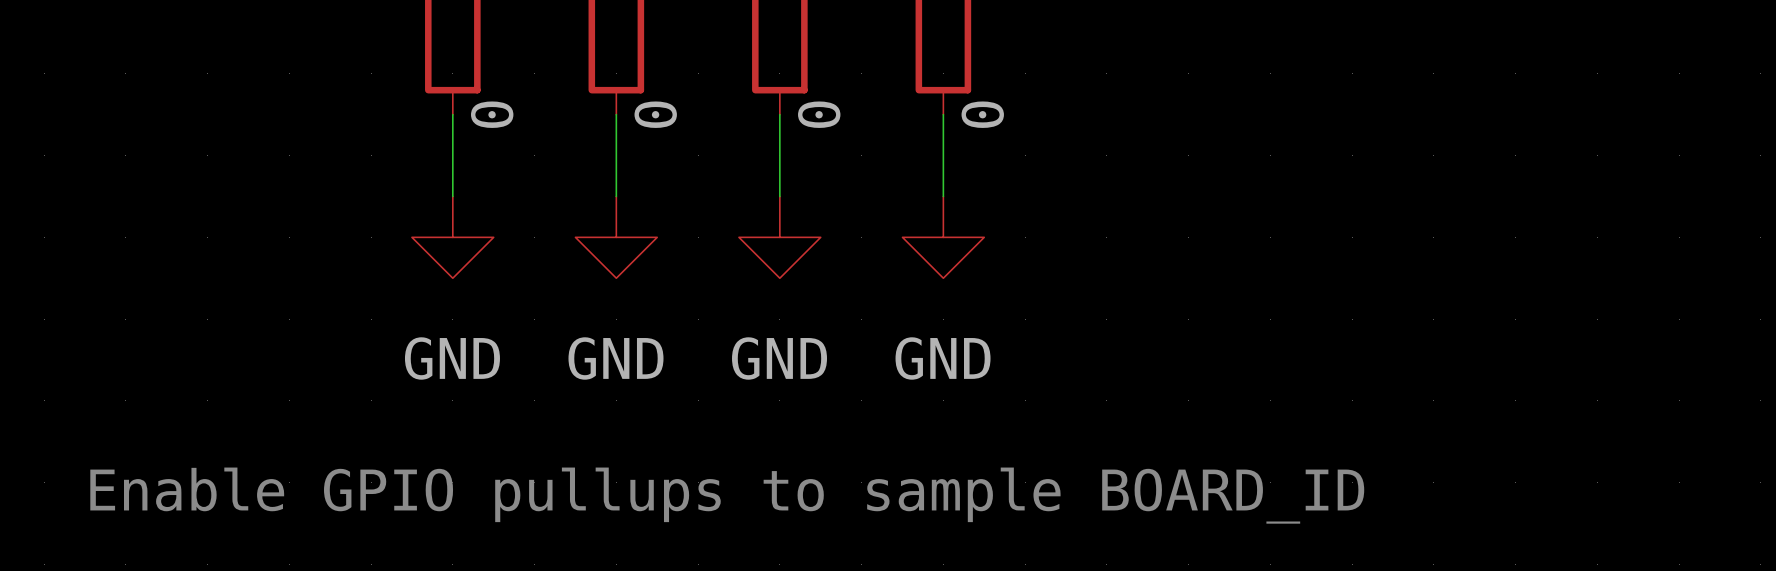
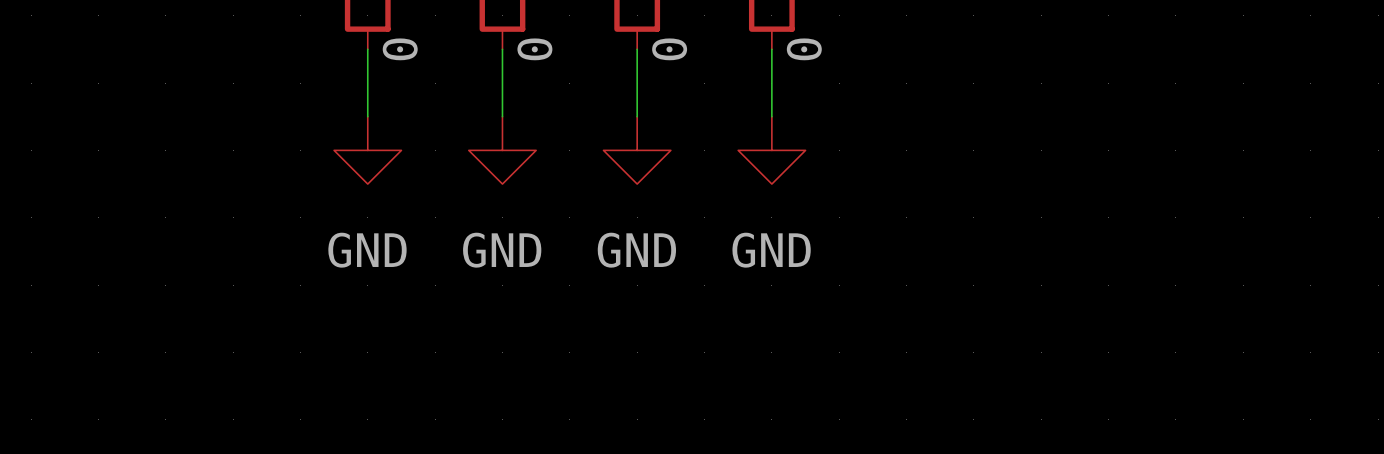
text: Enable GPIO pullups to sample BOARD_ID (727, 495) -> none

